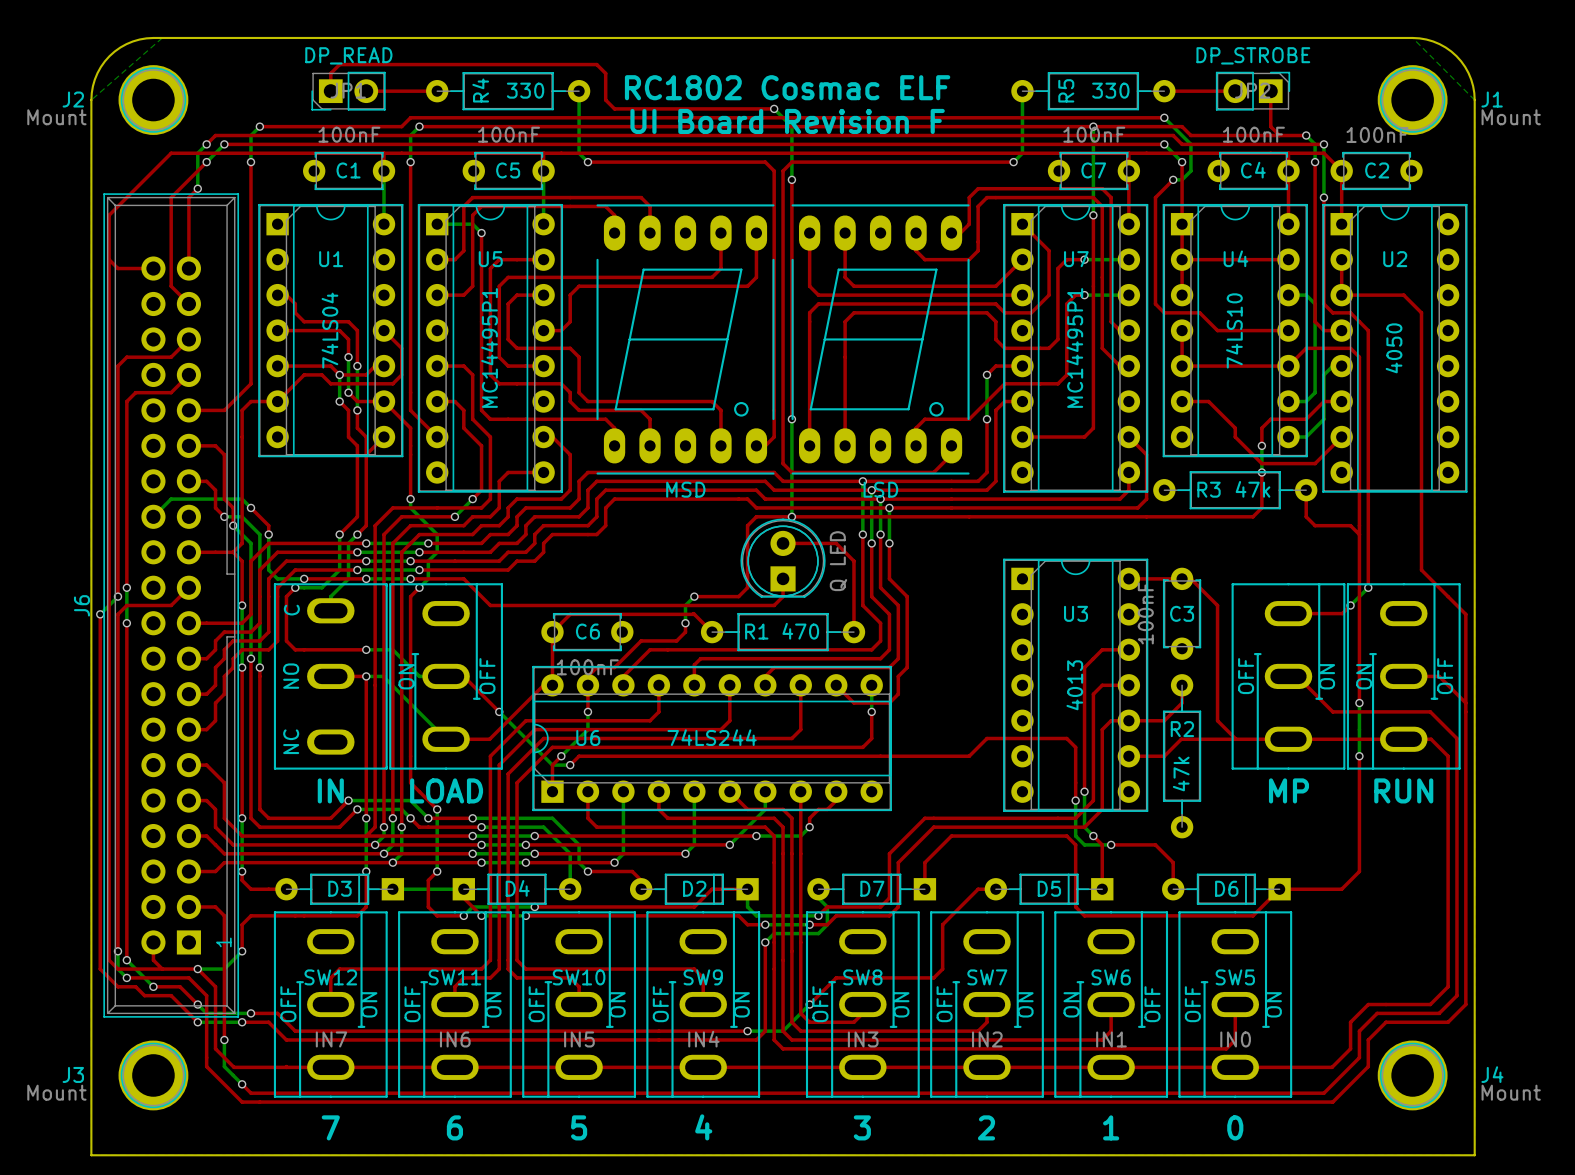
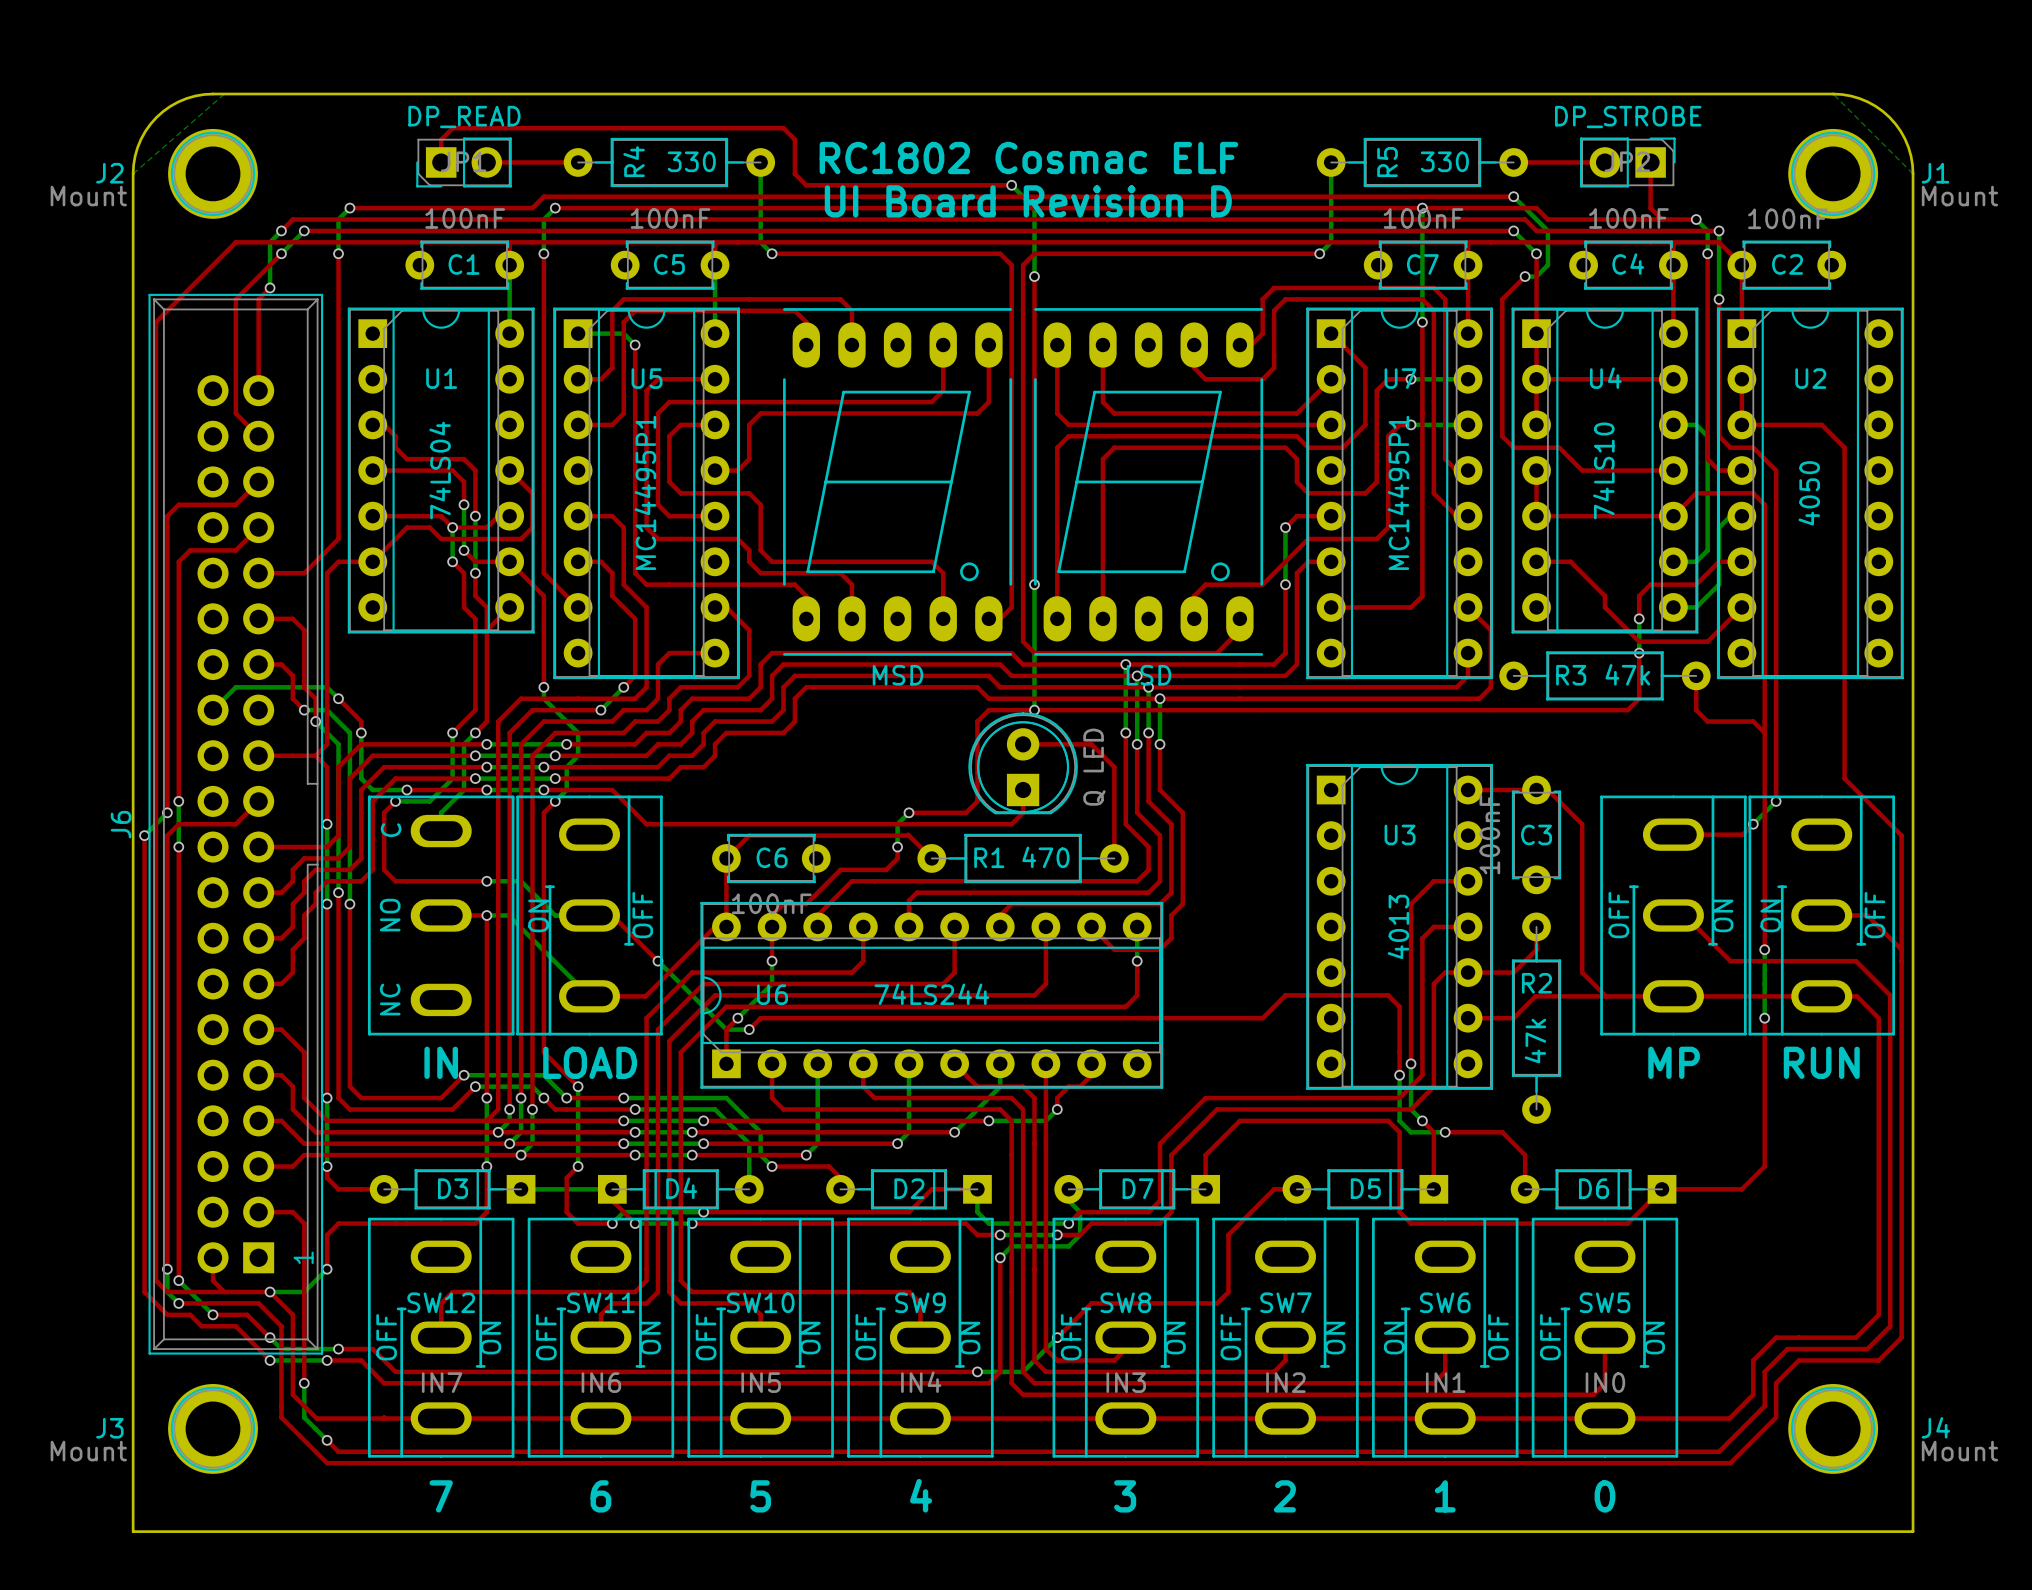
text: UI Board Revision F (787, 121) -> UI Board Revision D (1028, 201)
top track: (109, 259) (117, 268) (153, 268) -> none

